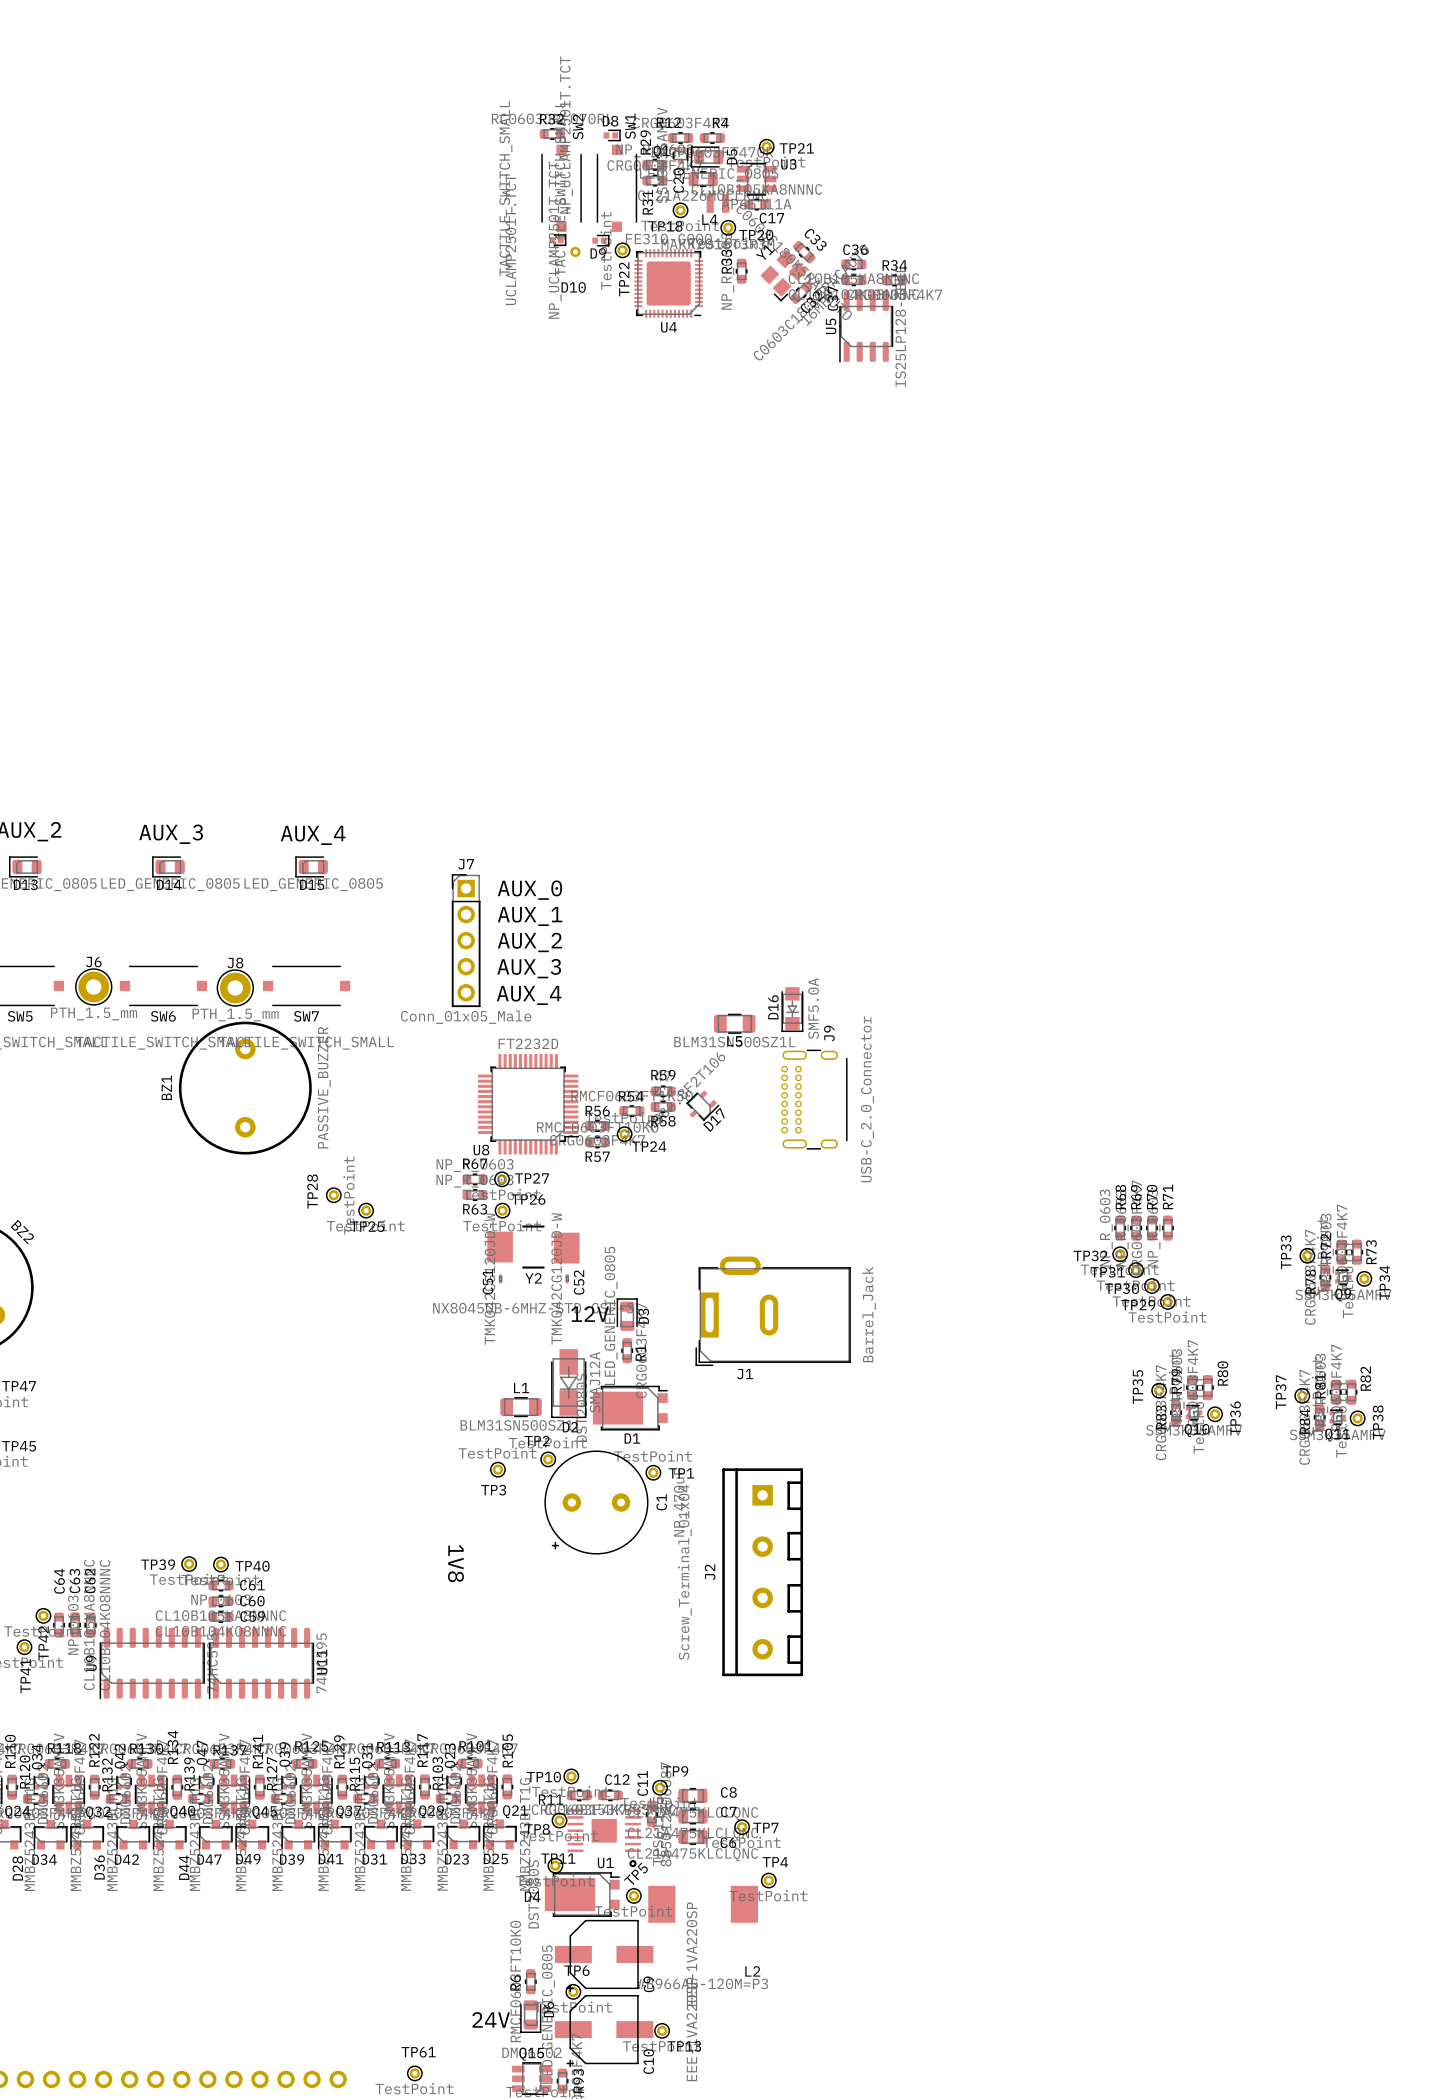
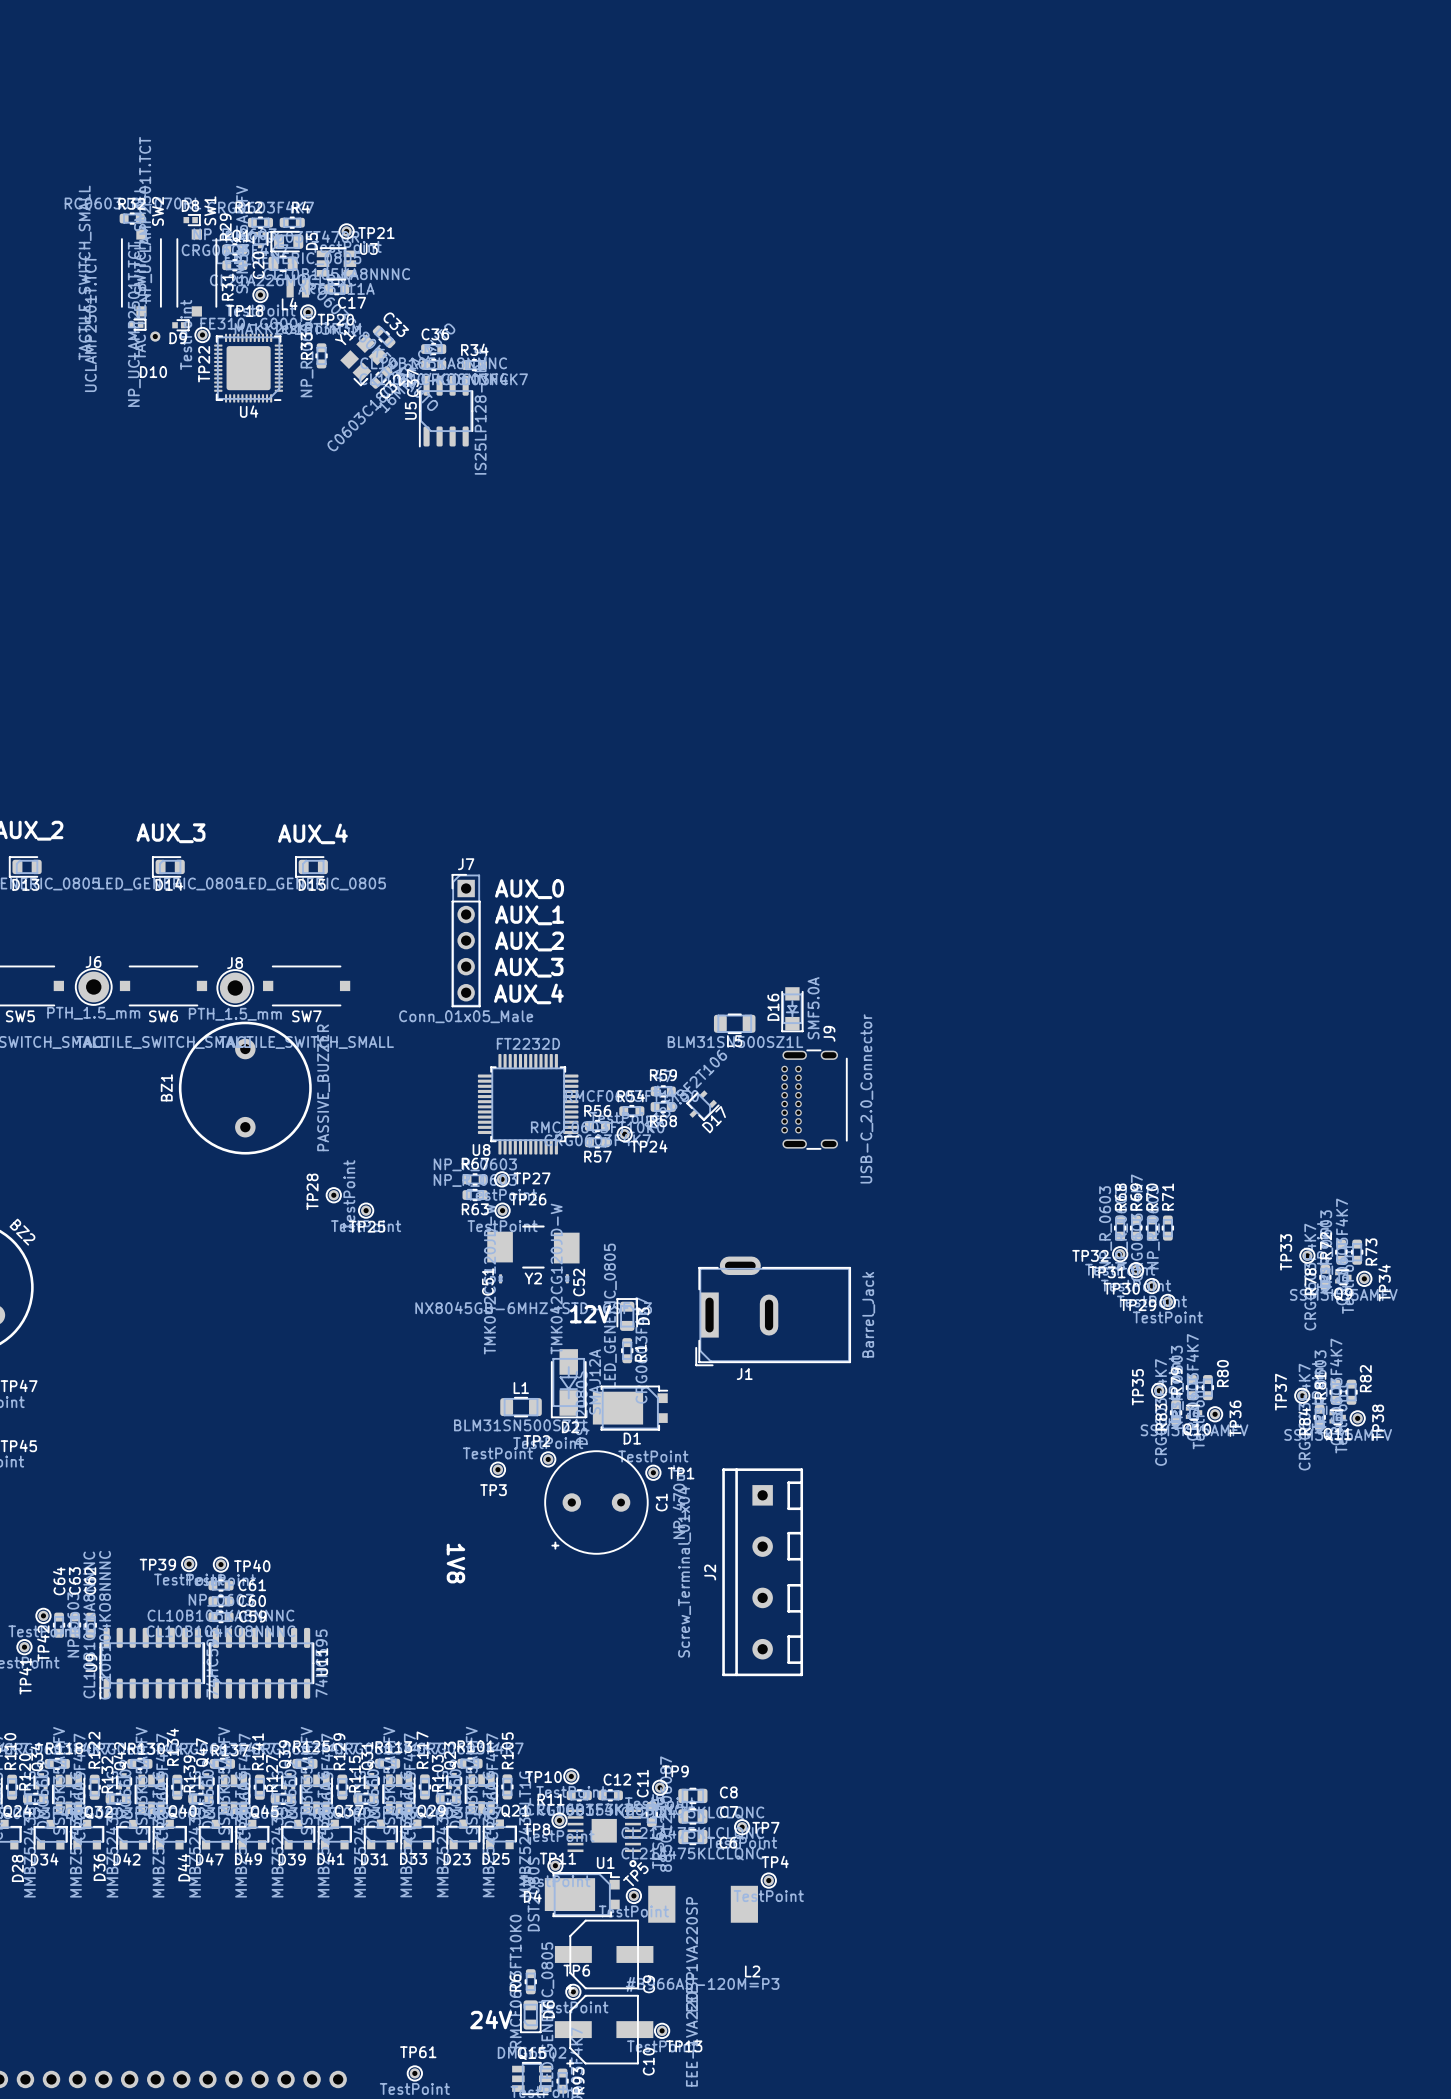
R32 position: (552, 133) -> (132, 218)
D8 position: (612, 135) -> (191, 220)
R12 position: (680, 138) -> (260, 222)
R4 position: (712, 138) -> (292, 222)
TP21 position: (766, 146) -> (346, 231)
Q1 position: (680, 155) -> (260, 240)
D5 position: (707, 157) -> (287, 241)
R29 position: (654, 164) -> (234, 249)
C20 position: (703, 179) -> (283, 263)
U3 position: (756, 179) -> (336, 263)
R31 position: (654, 180) -> (234, 265)
SW2 position: (561, 188) -> (141, 272)
SW1 position: (616, 188) -> (196, 272)
L4 position: (717, 203) -> (297, 288)
C17 position: (756, 204) -> (336, 289)
TP18 position: (680, 210) -> (260, 294)
TP20 position: (728, 227) -> (308, 312)
D10 position: (557, 240) -> (137, 324)
D9 position: (600, 240) -> (180, 325)
TP22 position: (622, 250) -> (202, 335)
part: (575, 251) -> none
C33 position: (804, 252) -> (384, 336)
C36 position: (853, 264) -> (433, 349)
R33 position: (741, 271) -> (321, 355)
Y1 position: (783, 275) -> (363, 360)
C37 position: (853, 280) -> (433, 364)
R34 position: (894, 280) -> (474, 365)
U4 position: (668, 283) -> (248, 368)
C32 position: (801, 292) -> (381, 377)
U5 position: (866, 326) -> (446, 411)
part: none -> (155, 336)

